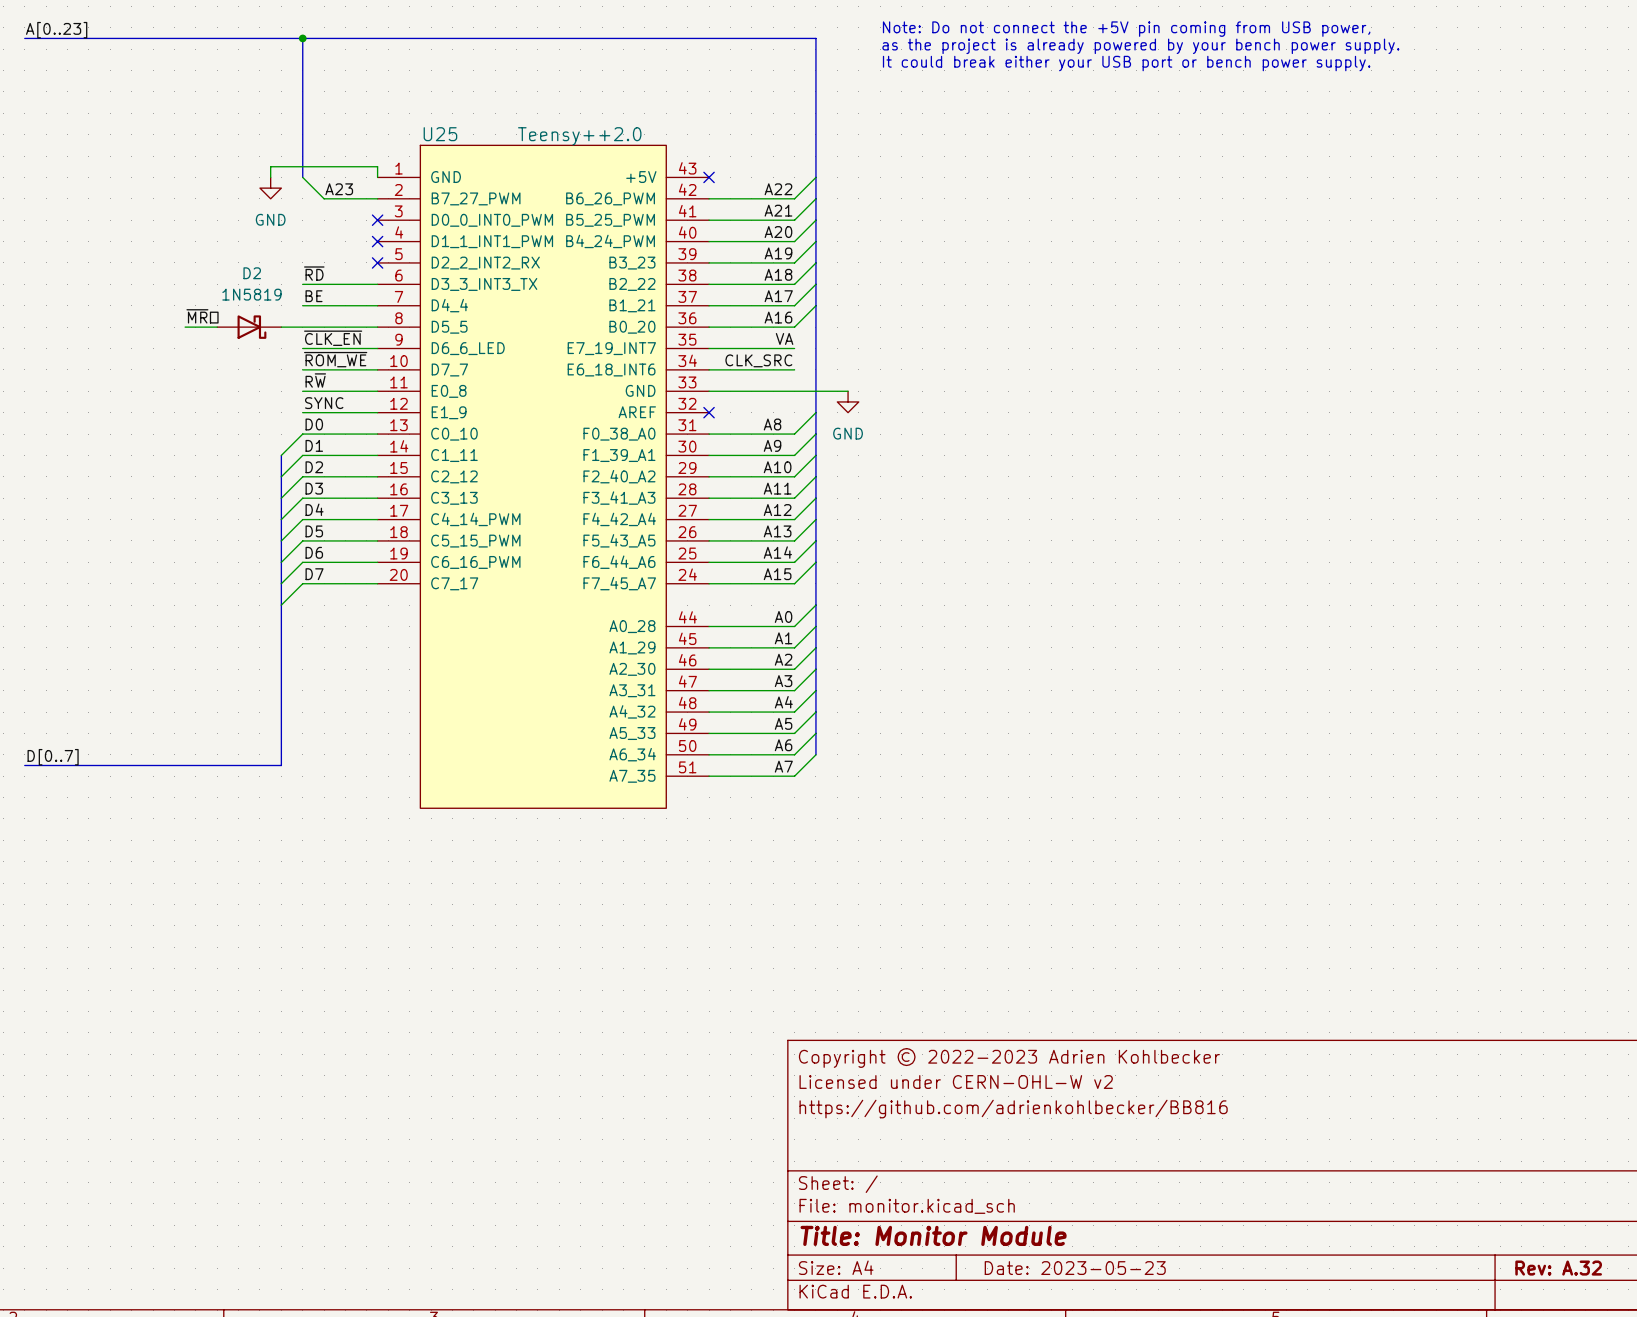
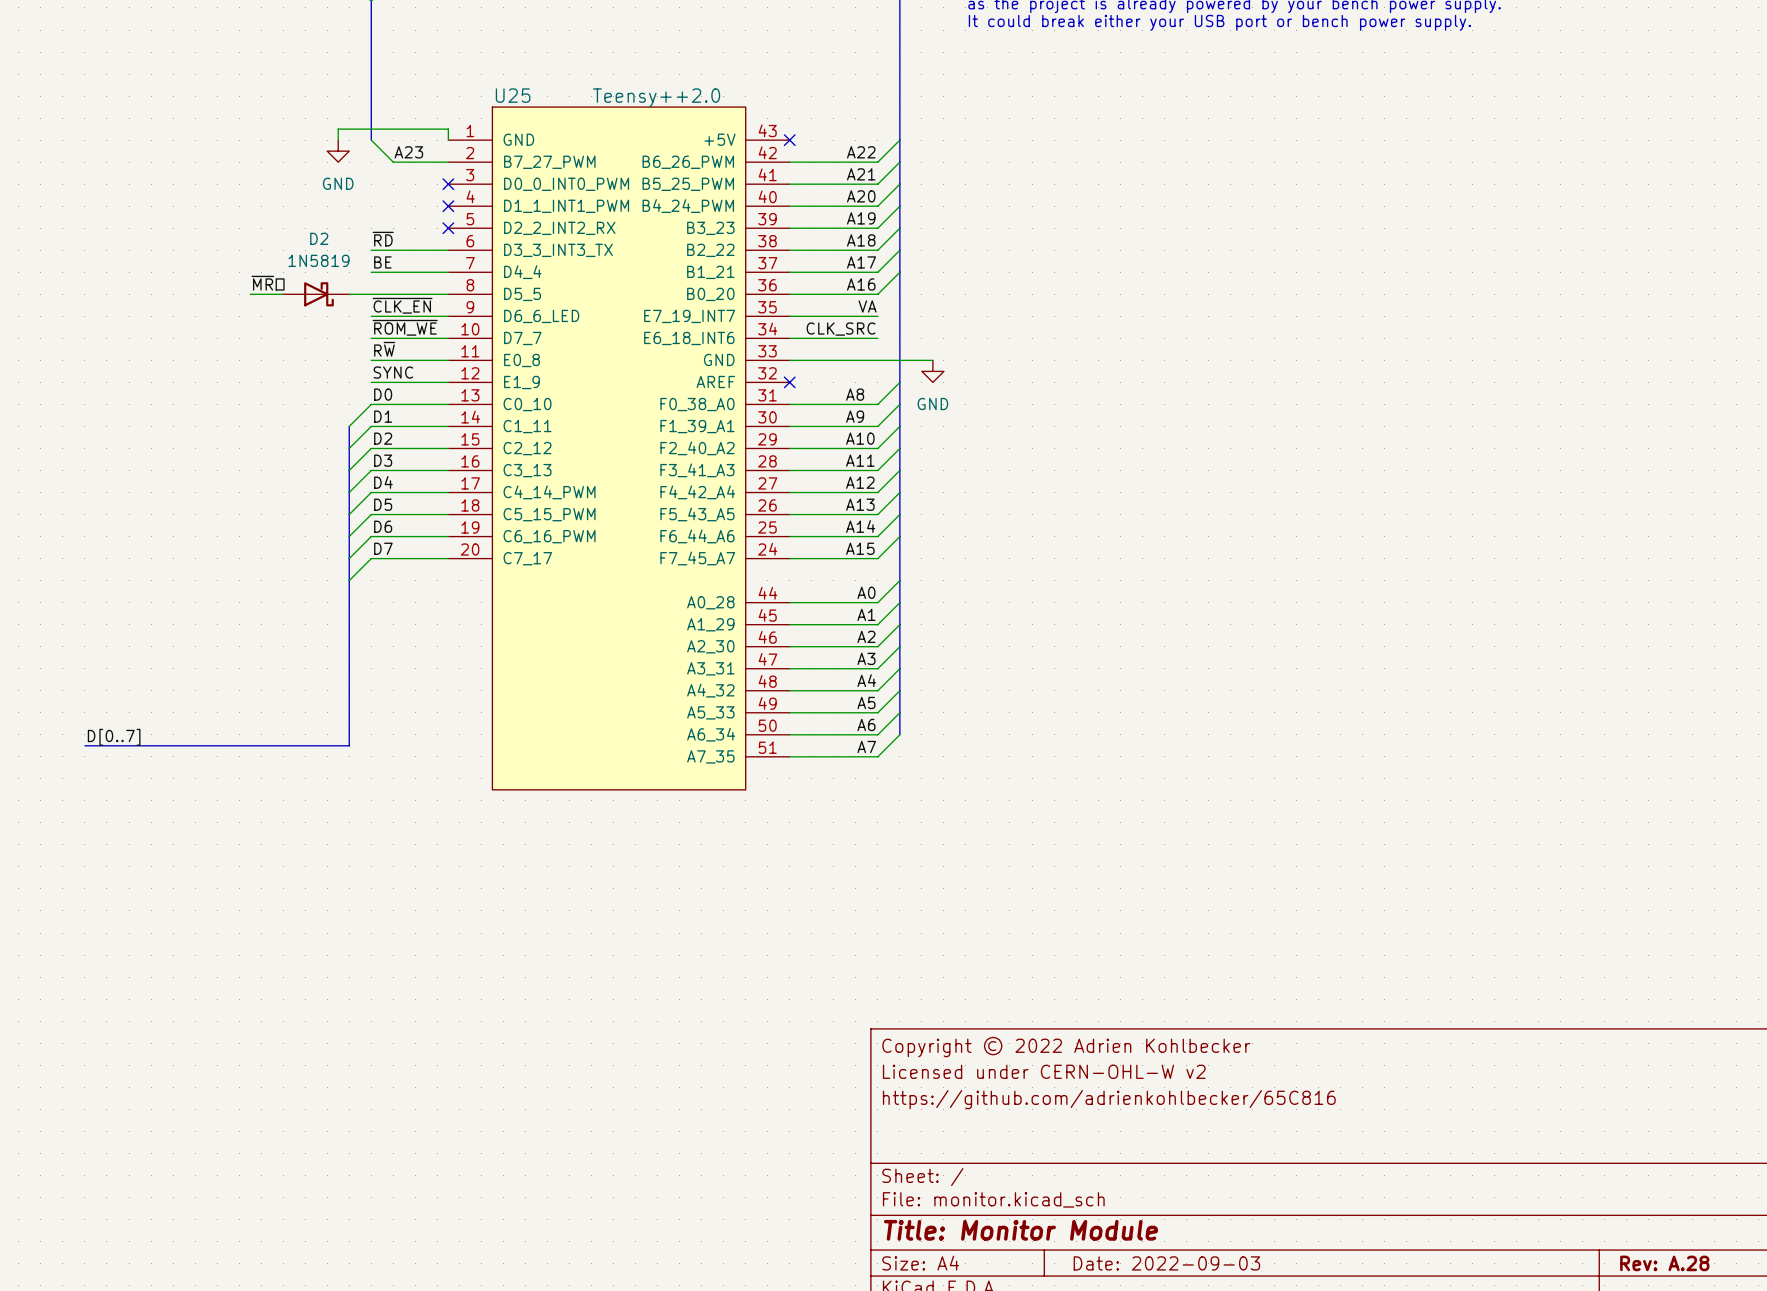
title block: Copyright © 2022-2023 Adrien Kohlbecker (1009, 1057) -> Copyright © 2022 Adrien Kohlbecker (1066, 1047)
title block: https://github.com/adrienkohlbecker/BB816 (1013, 1109) -> https://github.com/adrienkohlbecker/65C816 (1109, 1099)
title block: Date: 2023-05-23 (1075, 1268) -> Date: 2022-09-03 (1166, 1263)
title block: Rev: A.32 (1558, 1268) -> Rev: A.28 (1664, 1263)

